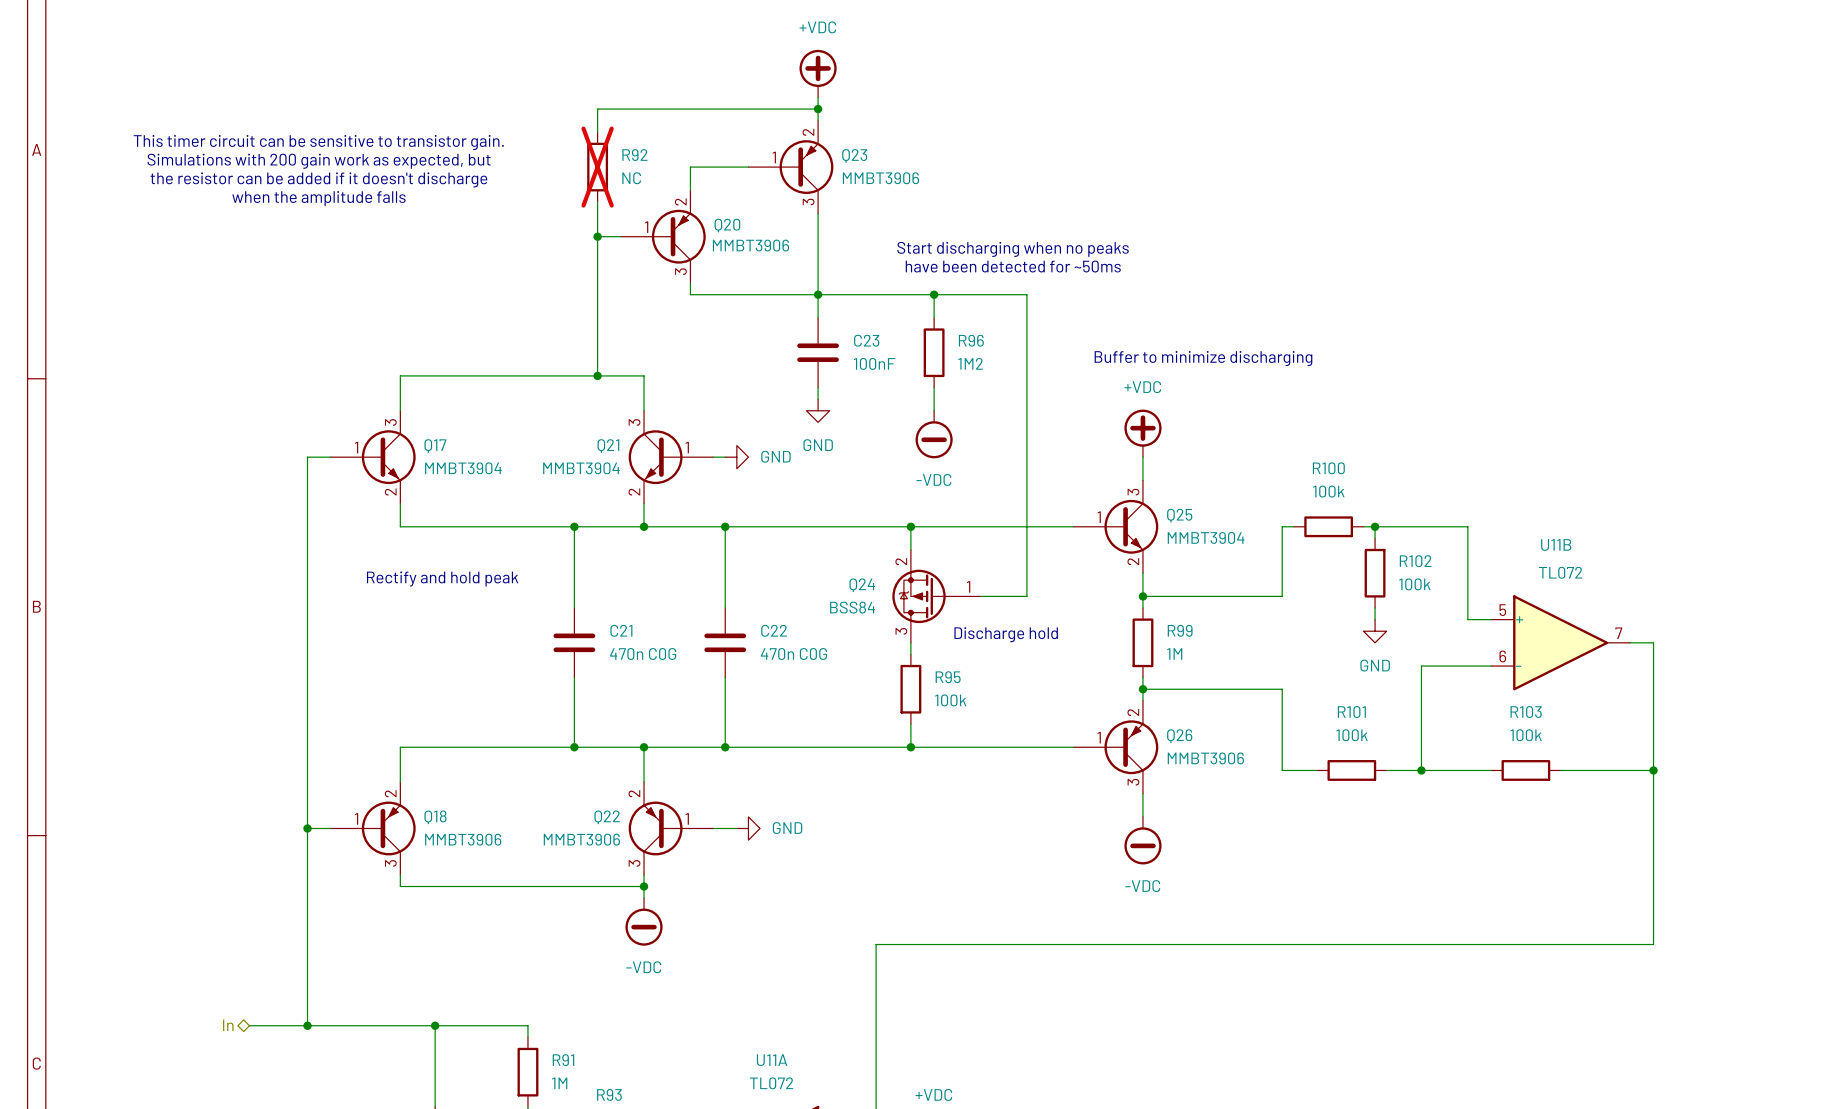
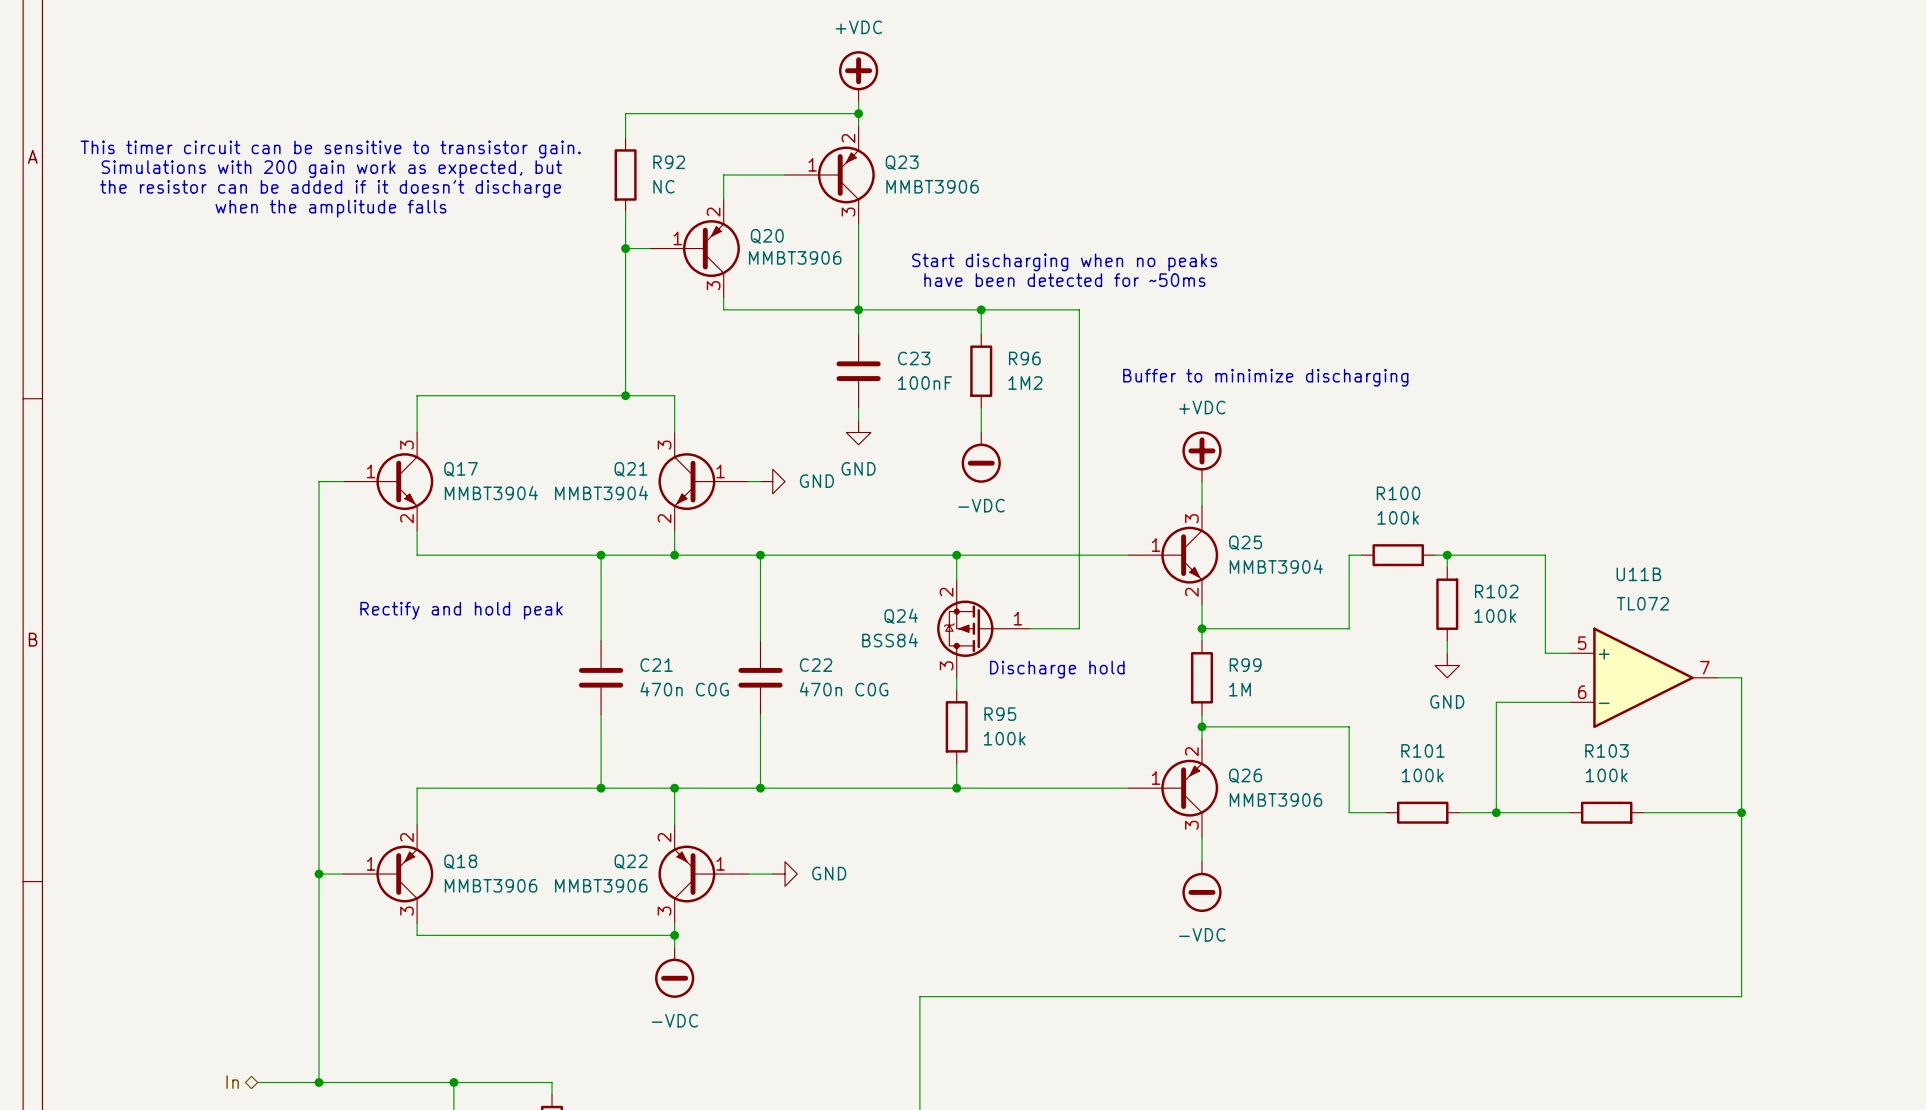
R92 do-not-place cross: (597, 167) -> none

